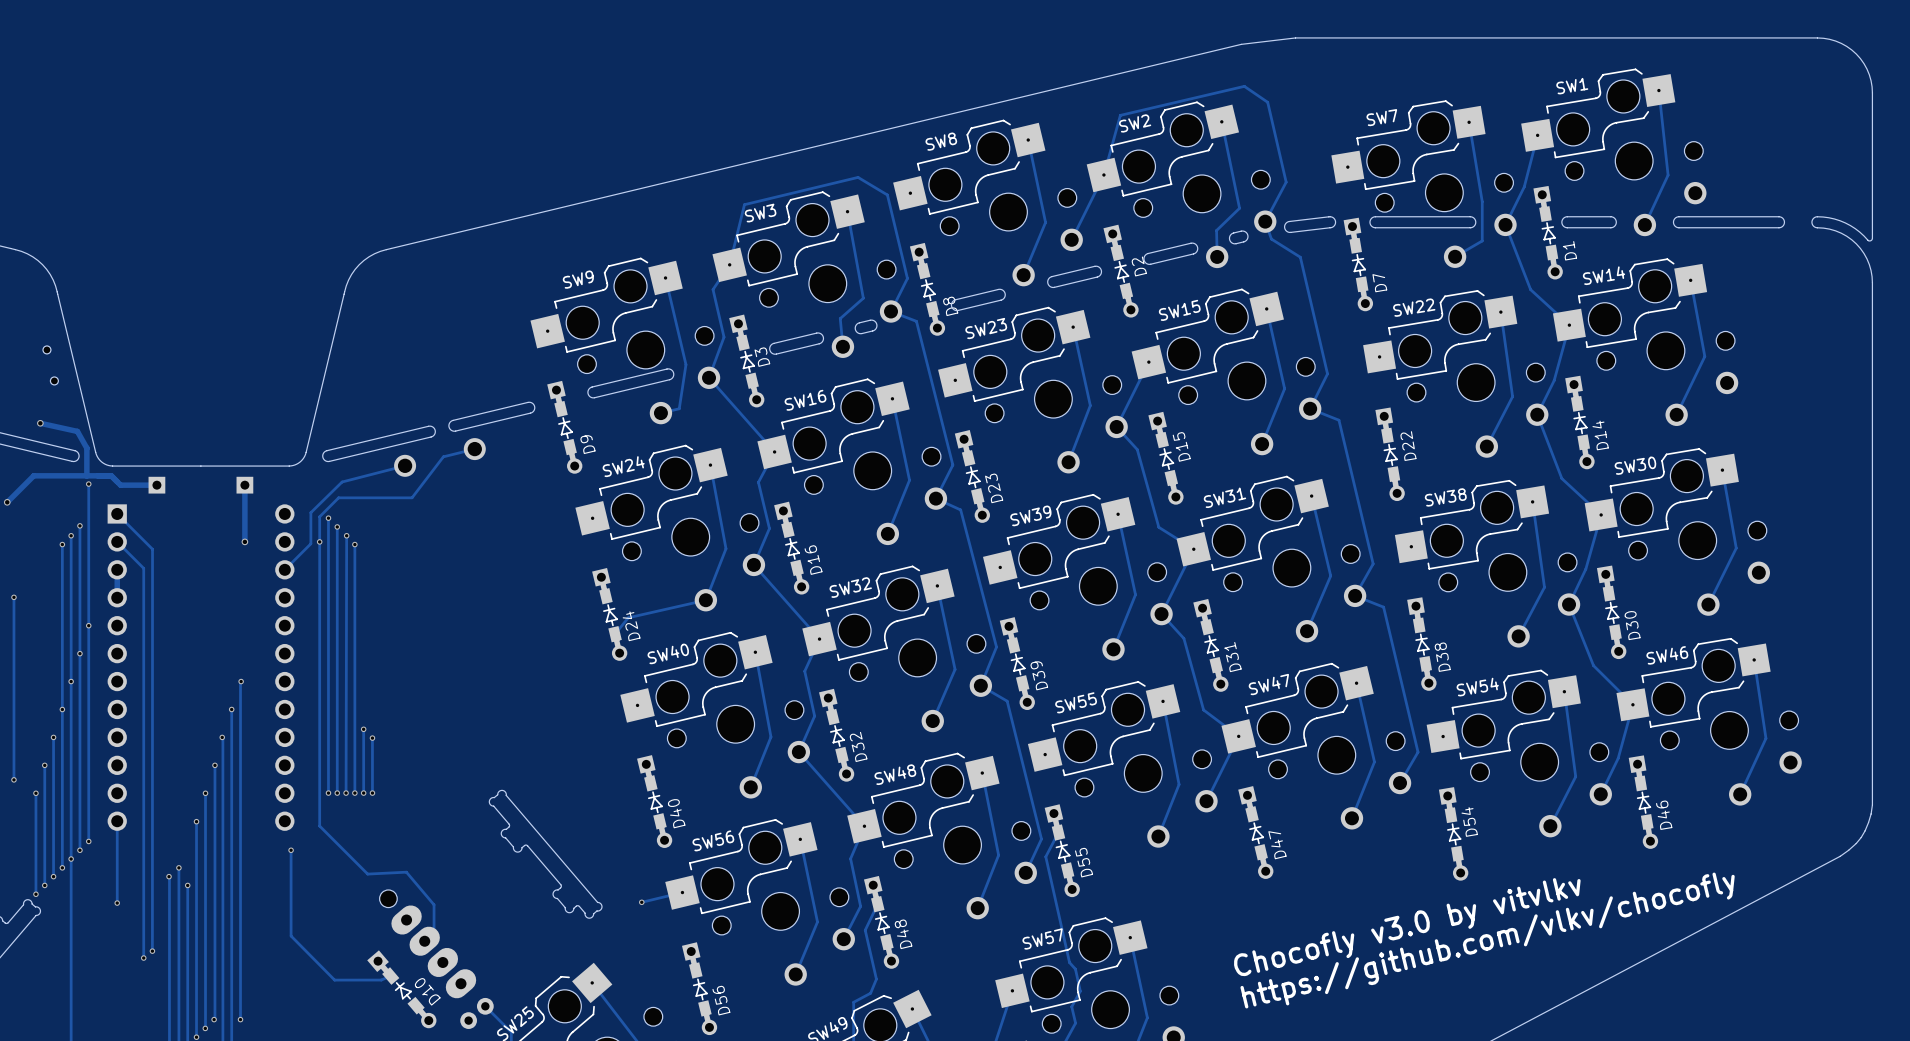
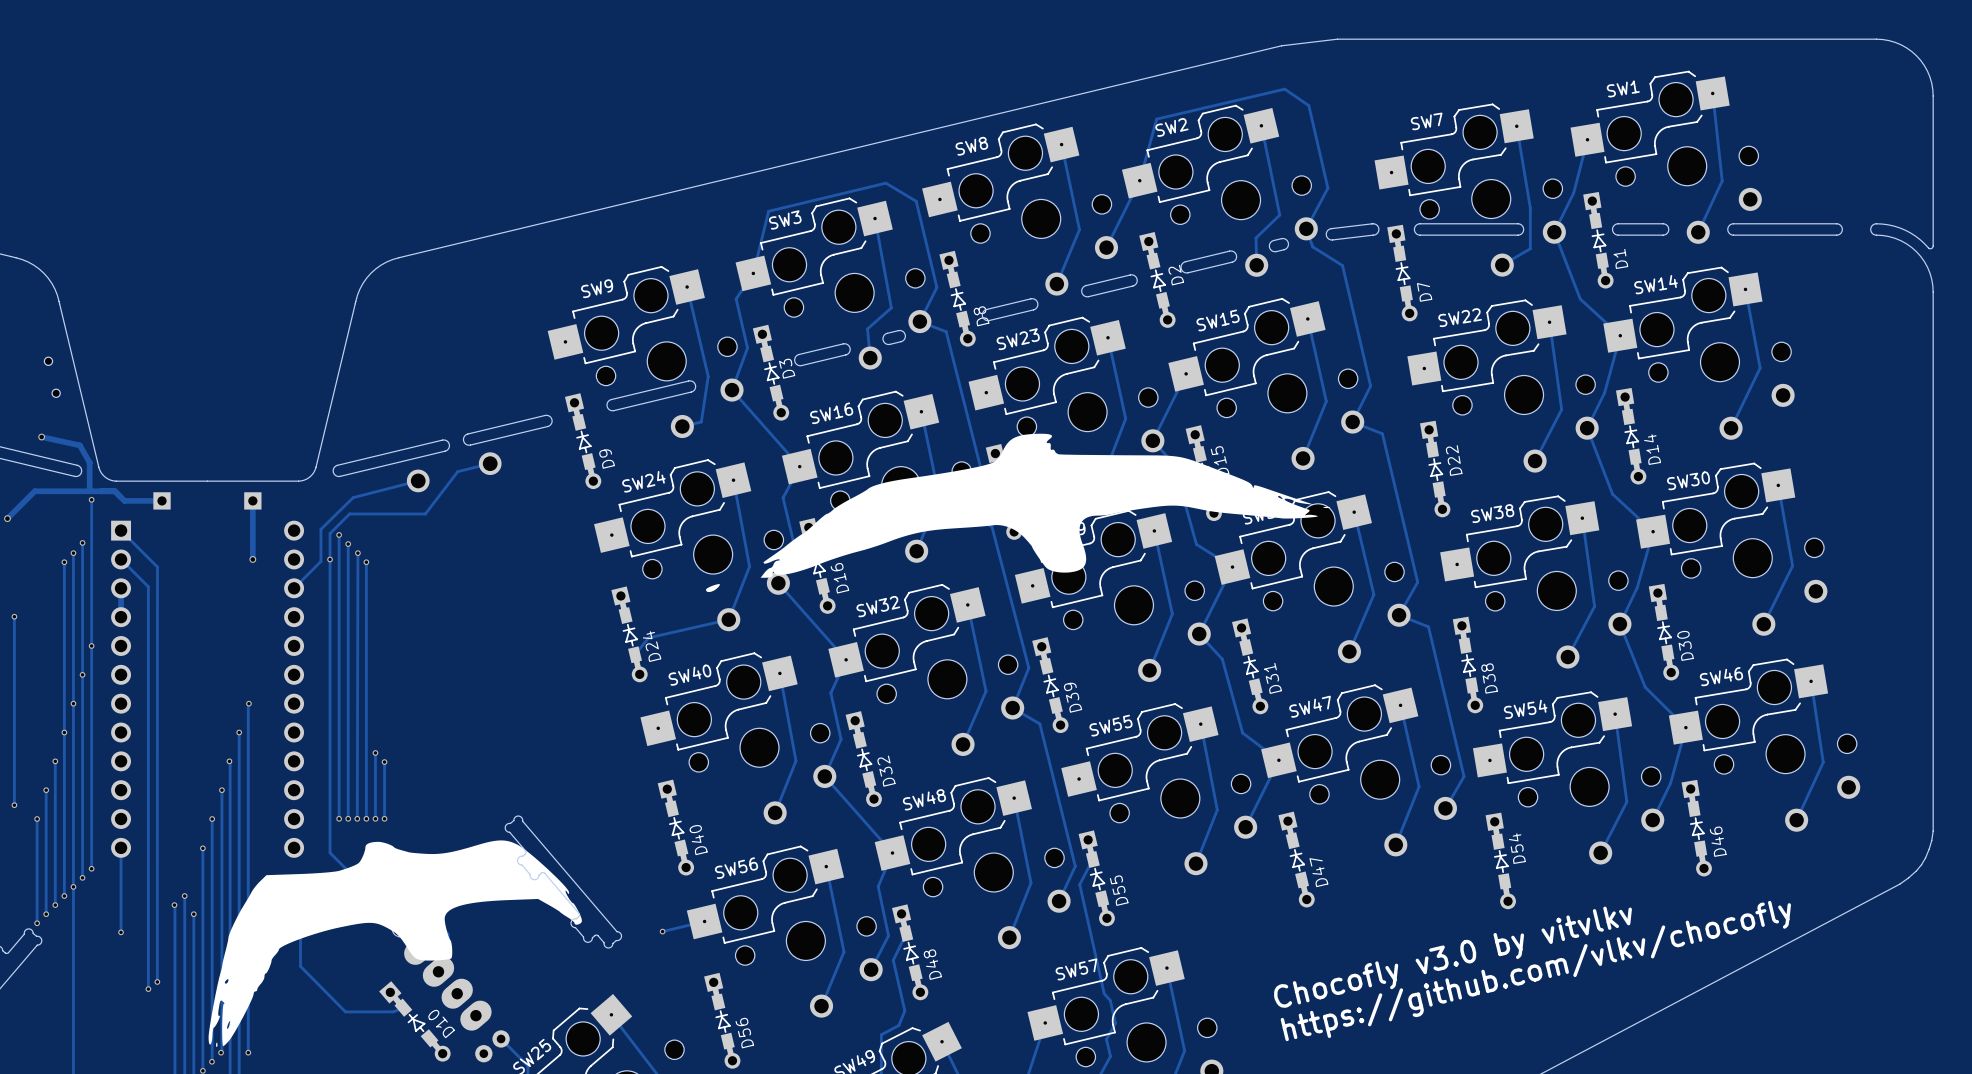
drawing: none -> [760, 433, 1331, 578]
drawing: none -> [706, 584, 720, 593]
drawing: none -> [208, 840, 582, 1047]

